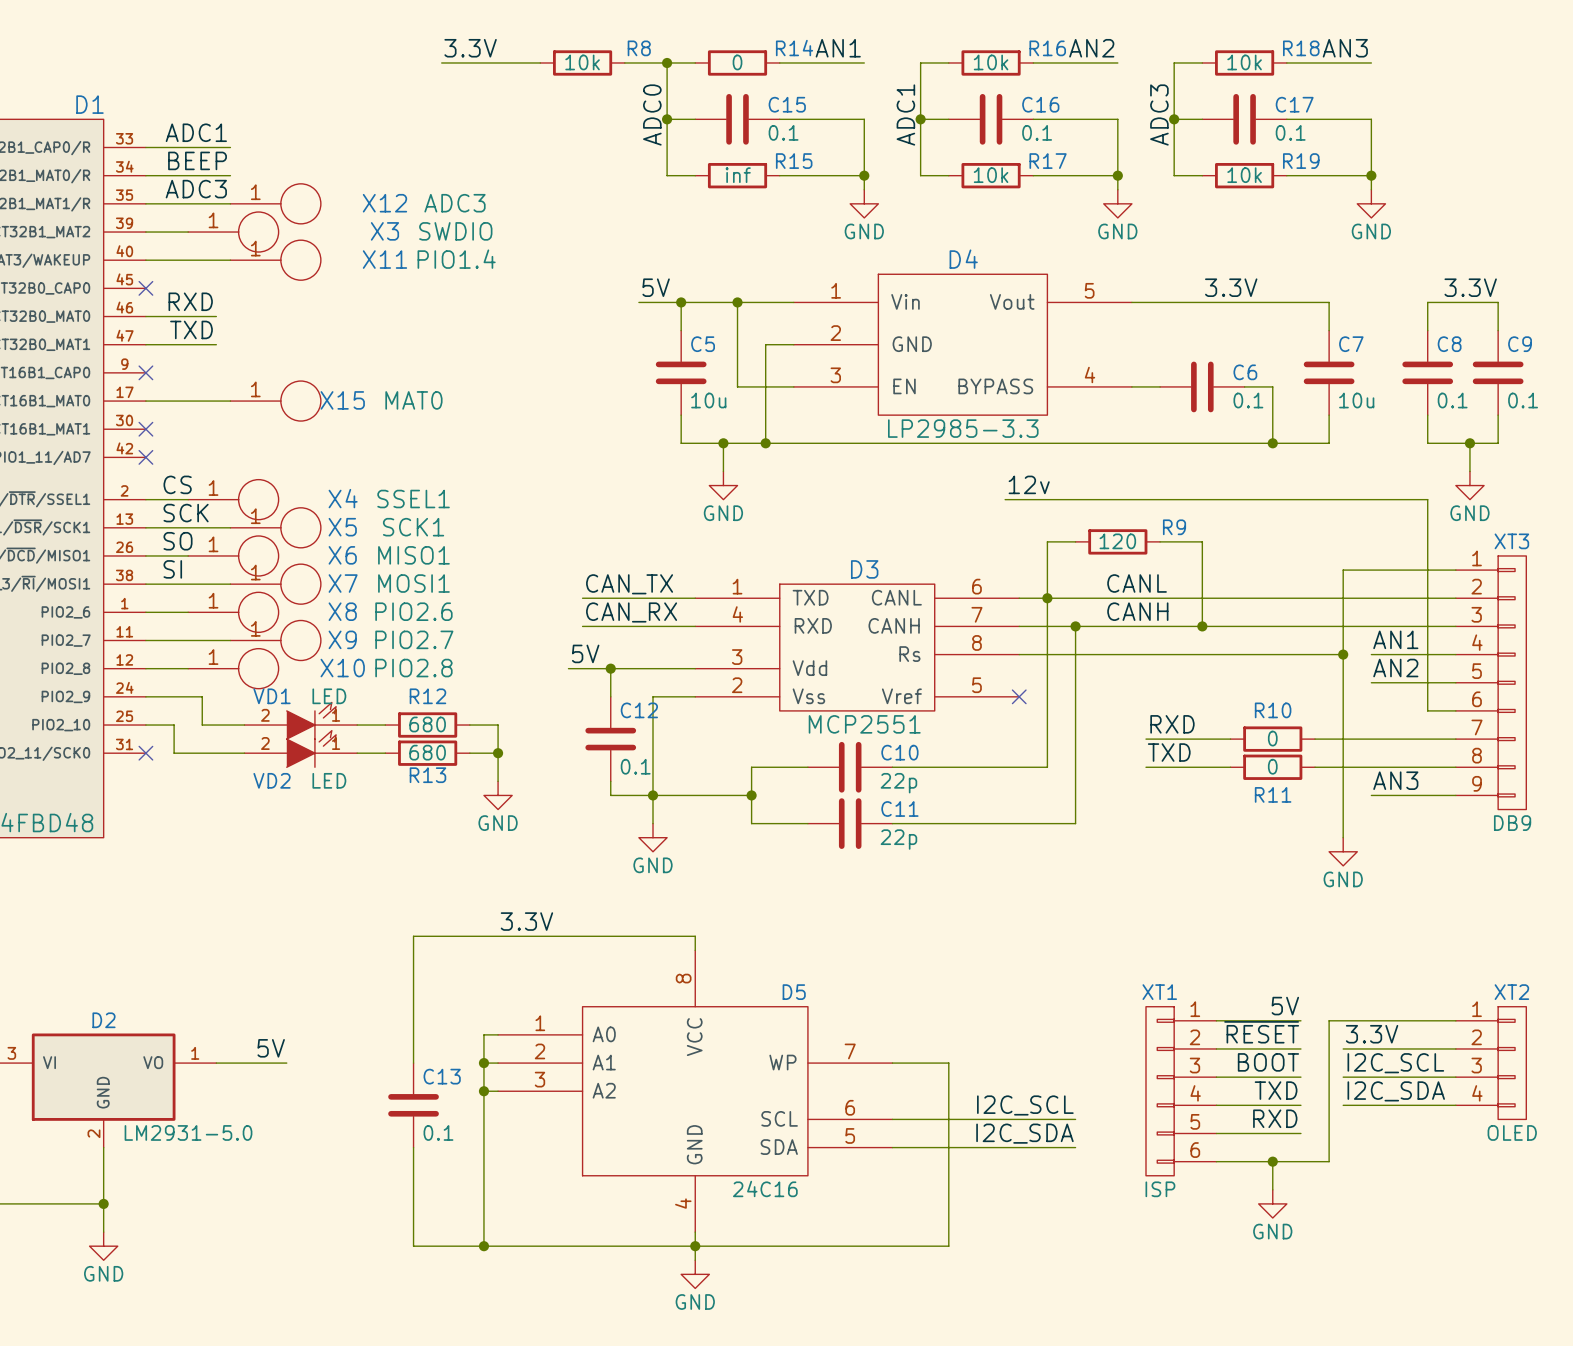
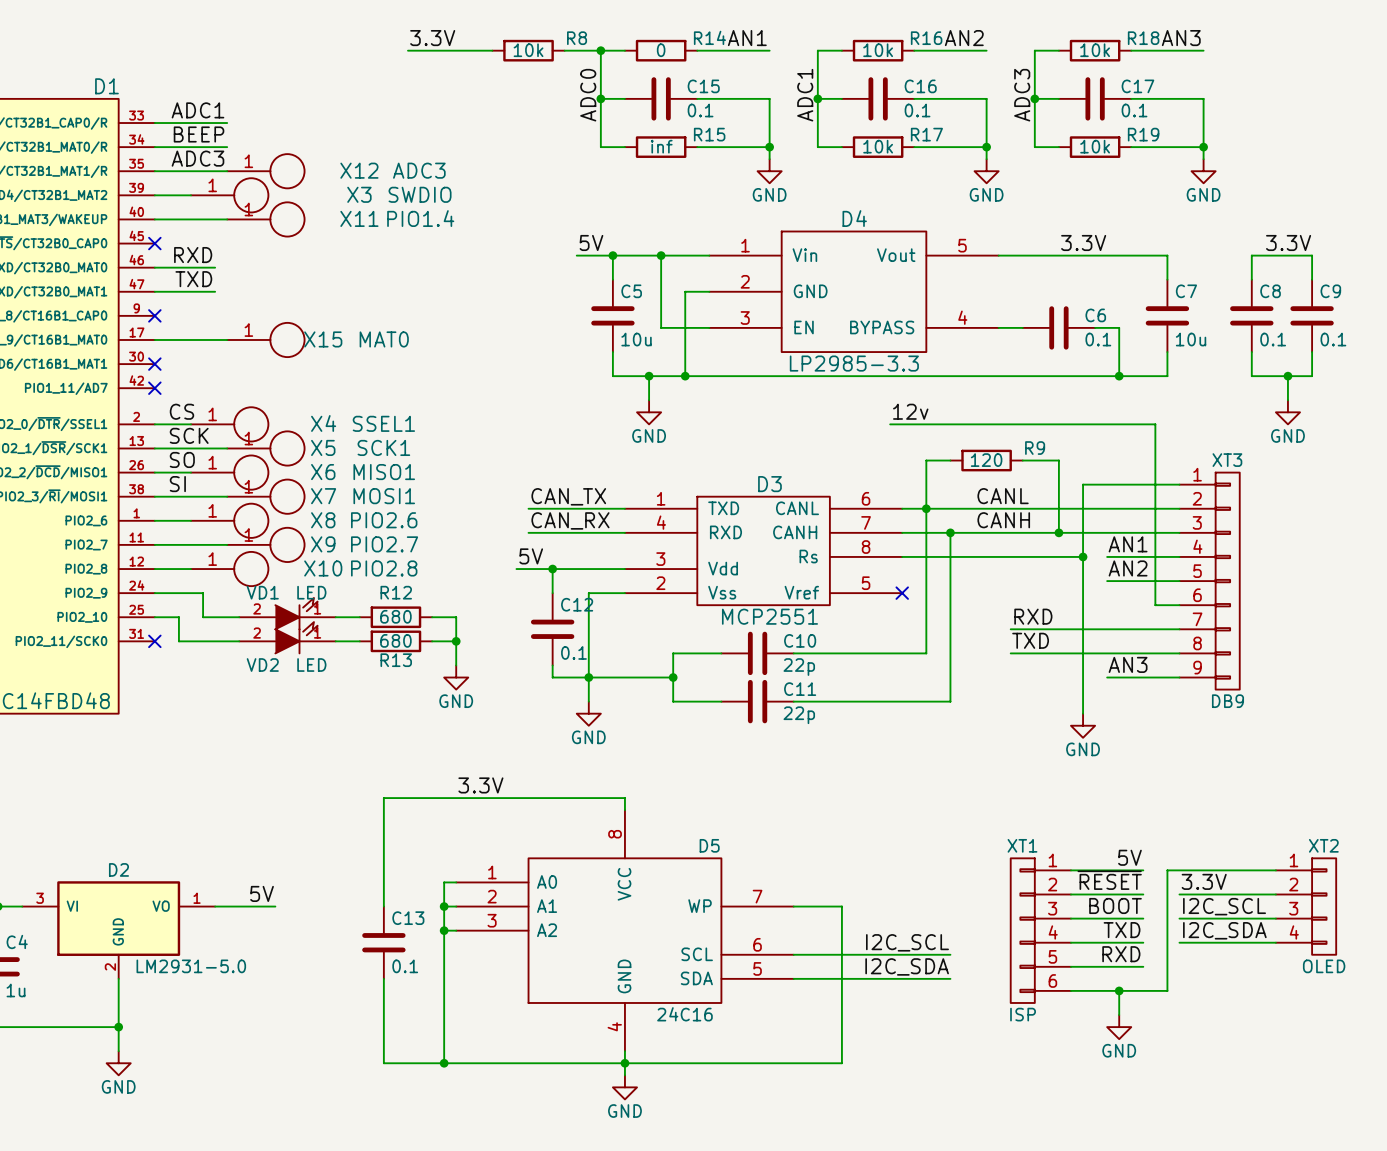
wire: (1315, 499) (1427, 499) (1427, 710) (1455, 710) -> (1155, 424) (1155, 605) (1179, 605)
wire: (1455, 570) (1343, 570) (1343, 837) -> (1179, 484) (1083, 484) (1083, 713)
wire: (1343, 598) (1455, 598) -> none
wire: (1343, 626) (1455, 626) -> none
label position: AN1 (1395, 639) -> AN1 (1128, 544)
wire: (1230, 654) (1258, 654) -> none
junction: none -> (1083, 556)
junction: (1343, 654) -> none
wire: (1371, 654) (1455, 654) -> (1083, 629) (1155, 629)
label position: AN2 (1395, 668) -> AN2 (1128, 568)
wire: (1371, 682) (1455, 682) -> (1107, 581) (1179, 581)
XT3 position: (1491, 682) -> (1209, 581)
R10: 0 (1272, 739) -> none
wire: (1343, 739) (1455, 739) -> none
wire: none -> (1083, 653) (1155, 653)
R11: 0 (1272, 767) -> none
wire: (1343, 767) (1455, 767) -> none
label position: AN3 (1395, 780) -> AN3 (1128, 664)
wire: (1371, 795) (1455, 795) -> (1107, 677) (1179, 677)
power symbol position: GND (1343, 851) -> GND (1083, 725)

